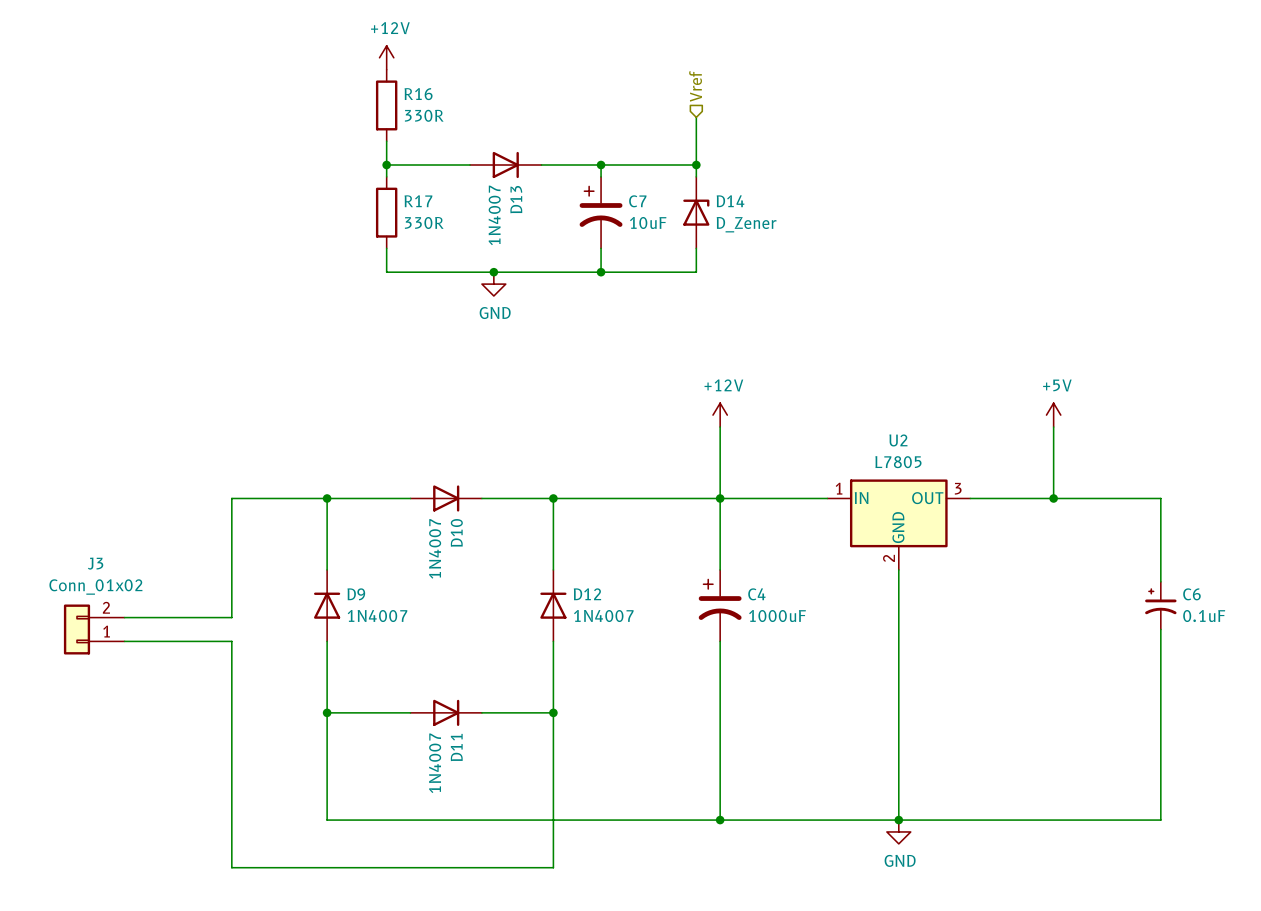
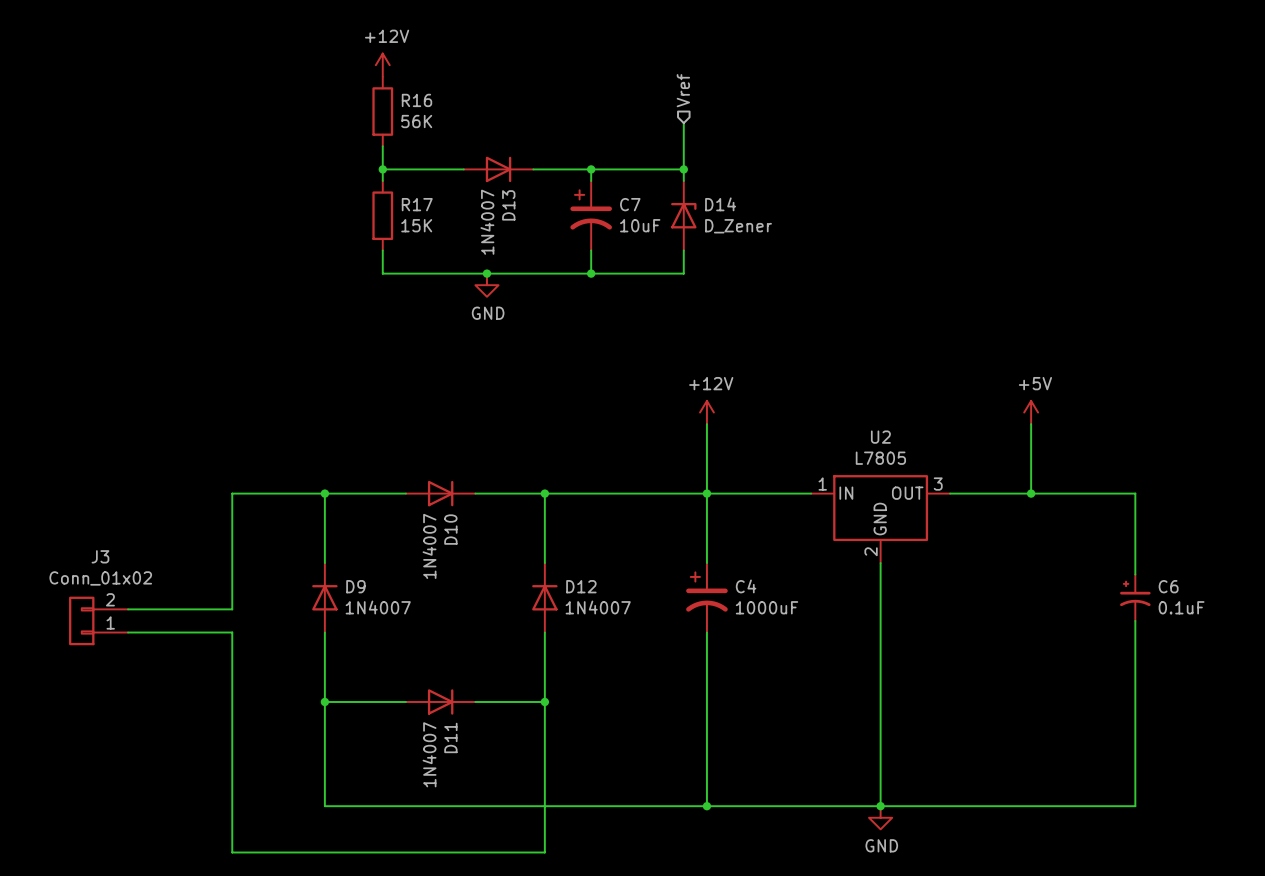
R16 value: 330R (424, 115) -> 56K (416, 121)
R17 value: 330R (424, 222) -> 15K (416, 225)

